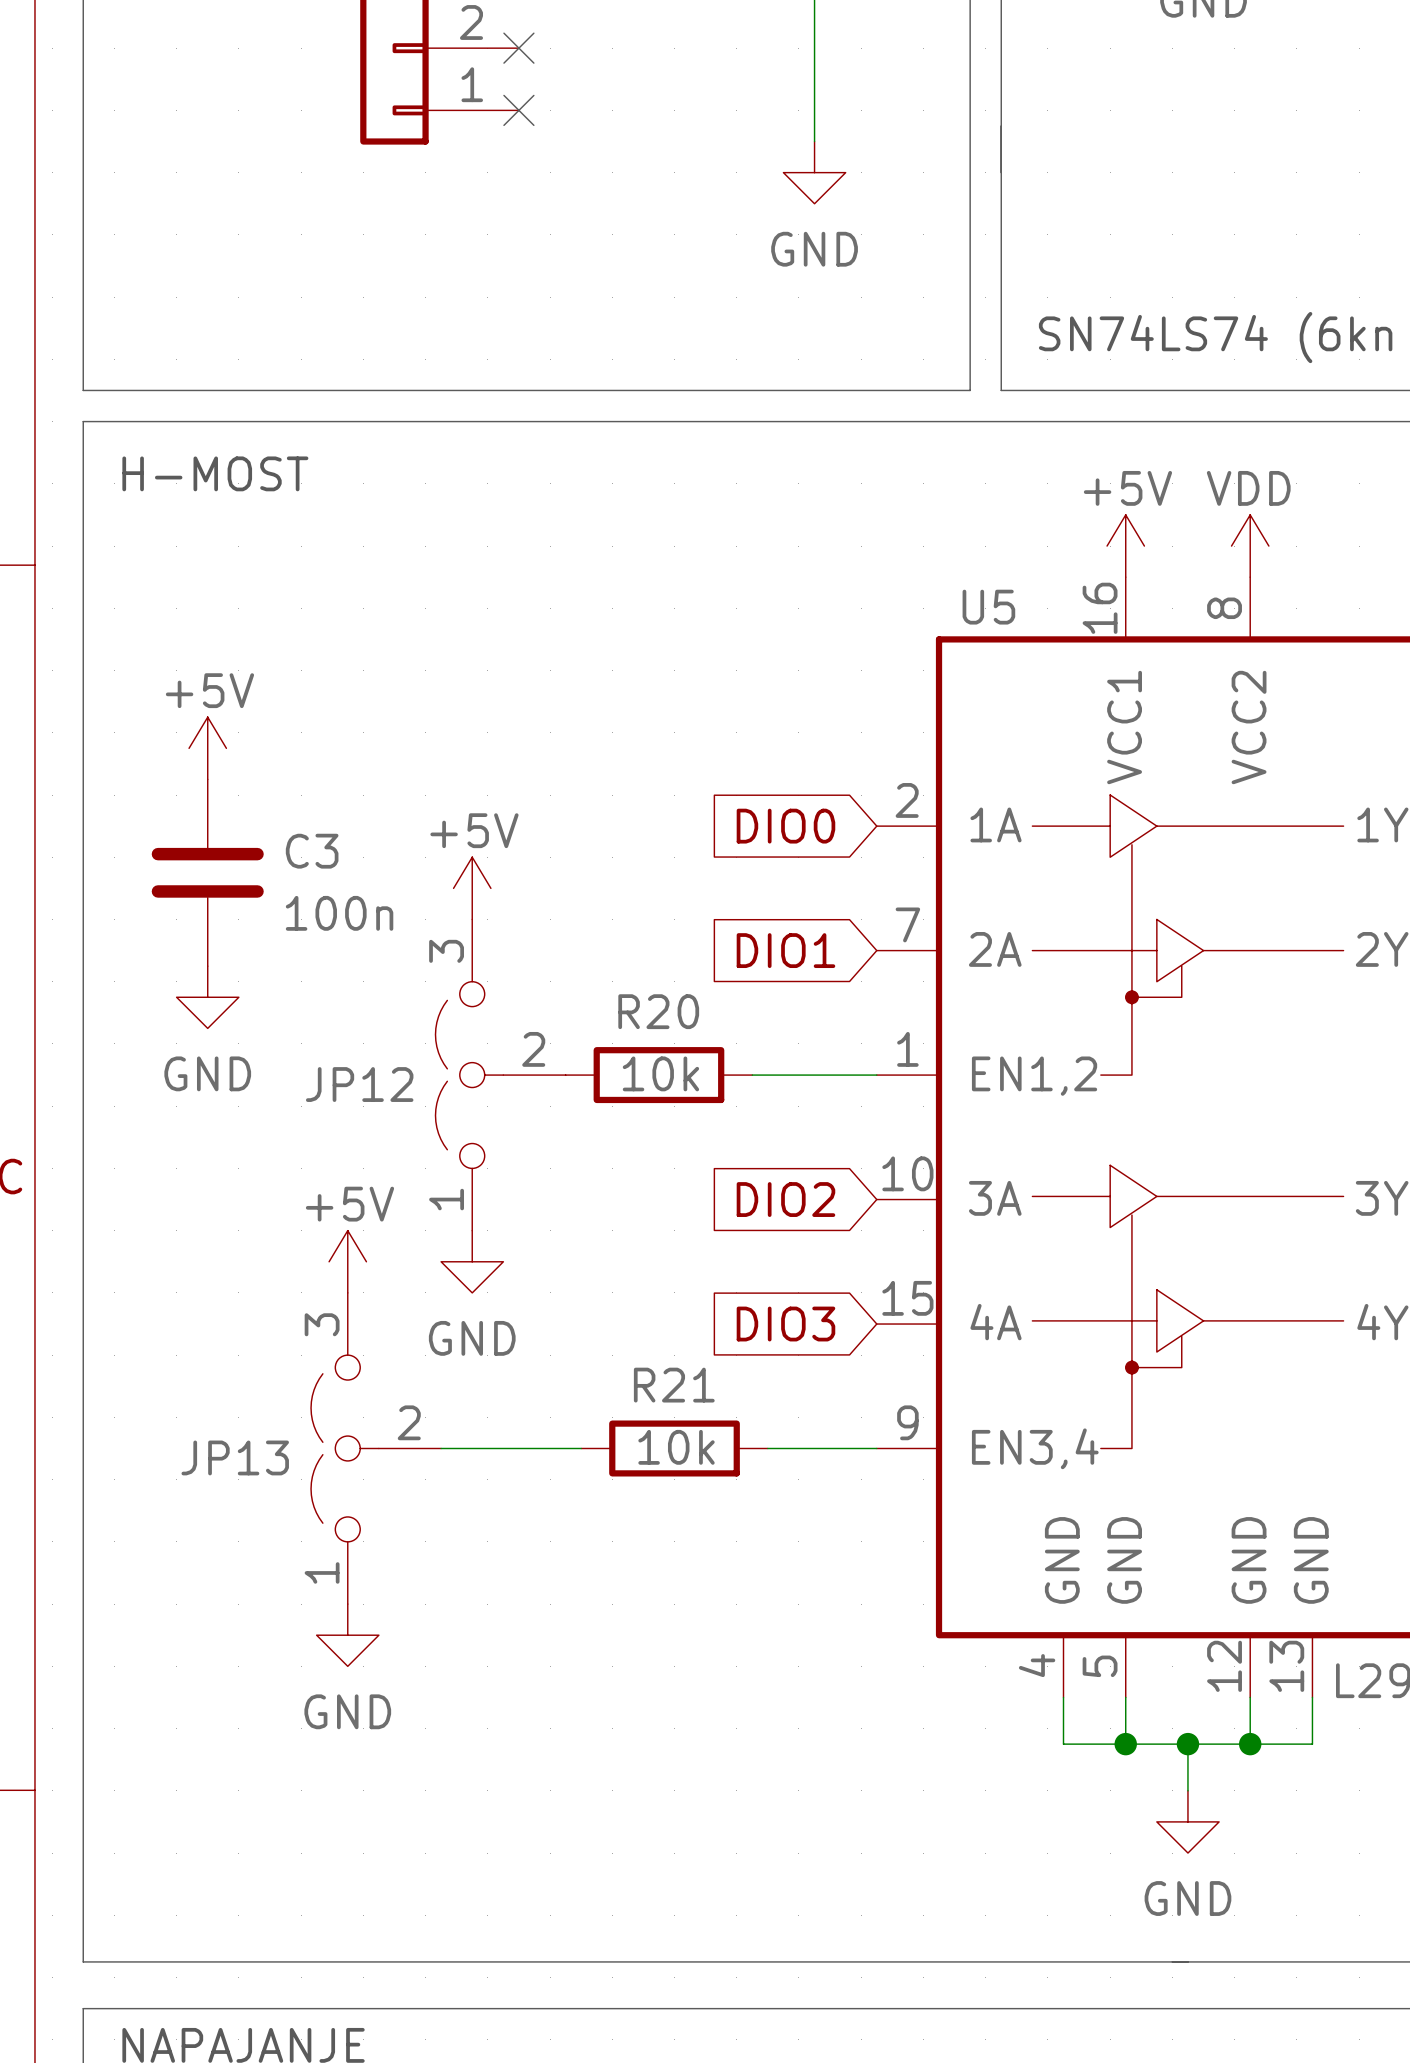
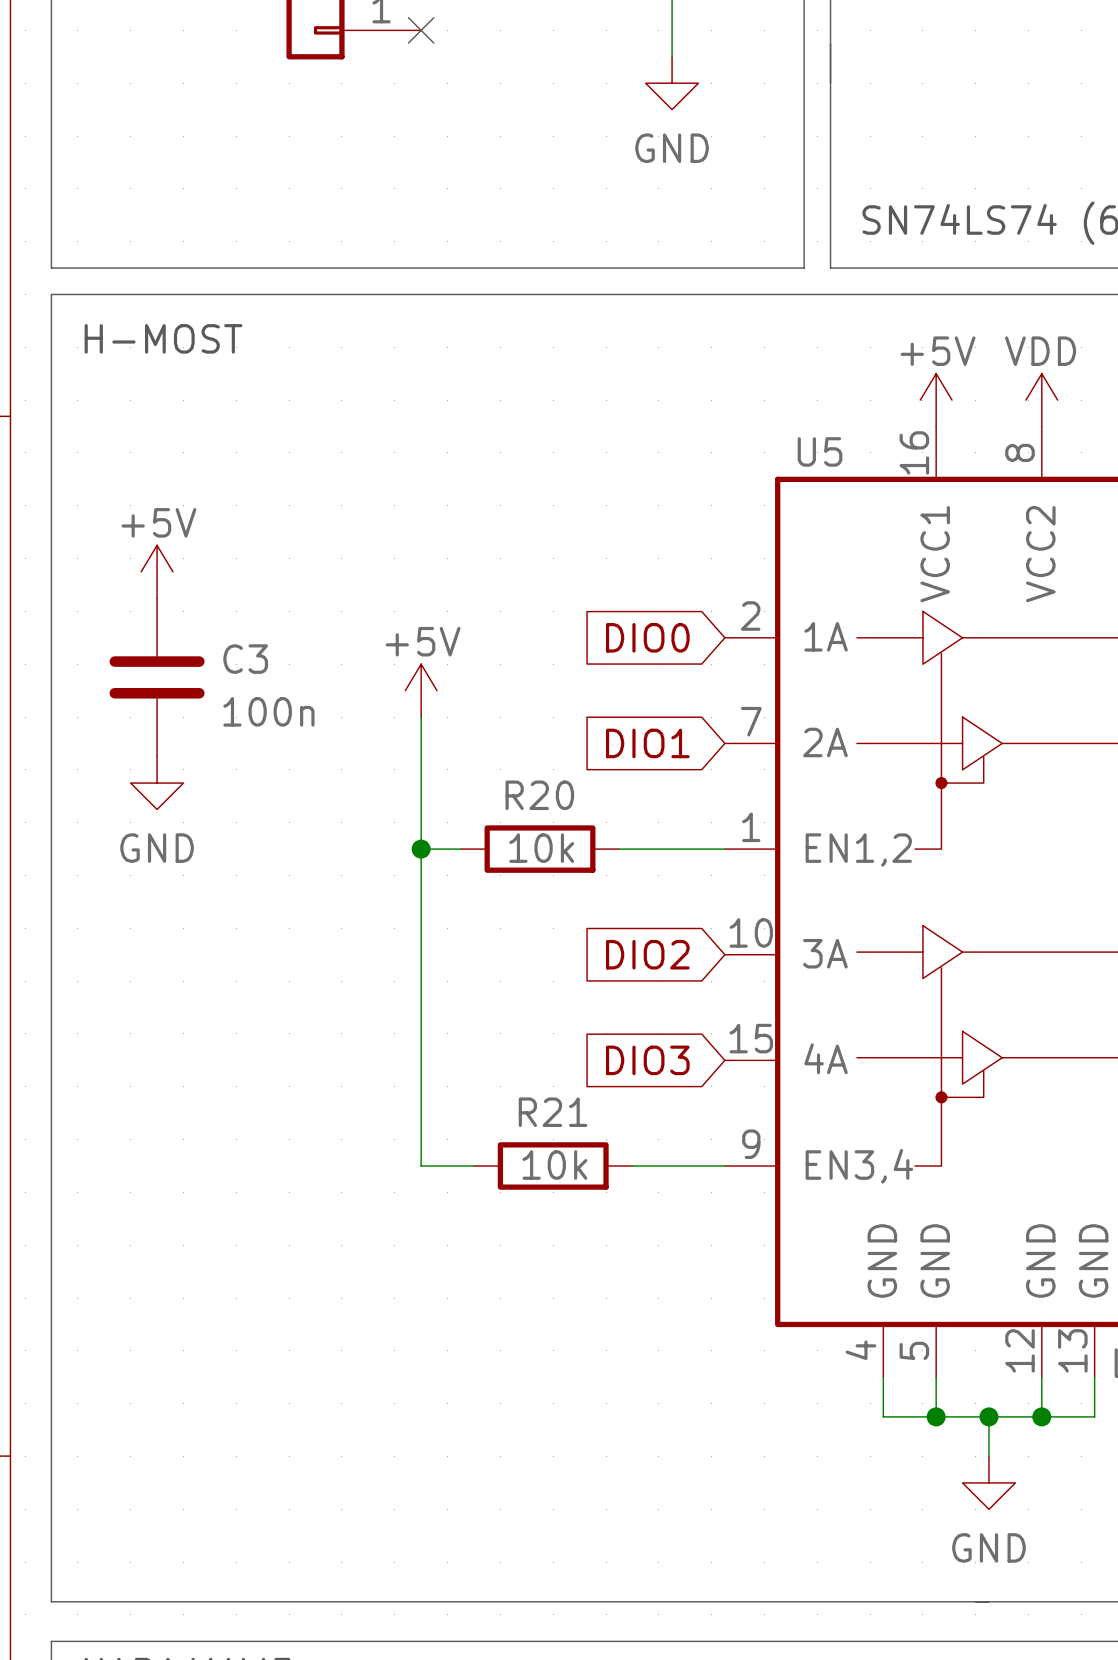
power symbol position: +5V (472, 888) -> +5V (421, 690)
JP12: (500, 1075) -> none
junction: none -> (421, 849)
power symbol: +5V (347, 1261) -> none
power symbol: GND (472, 1261) -> none
JP13: (376, 1448) -> none
wire: (441, 1448) (518, 1448) -> (421, 717) (421, 1166)
power symbol: GND (347, 1635) -> none

